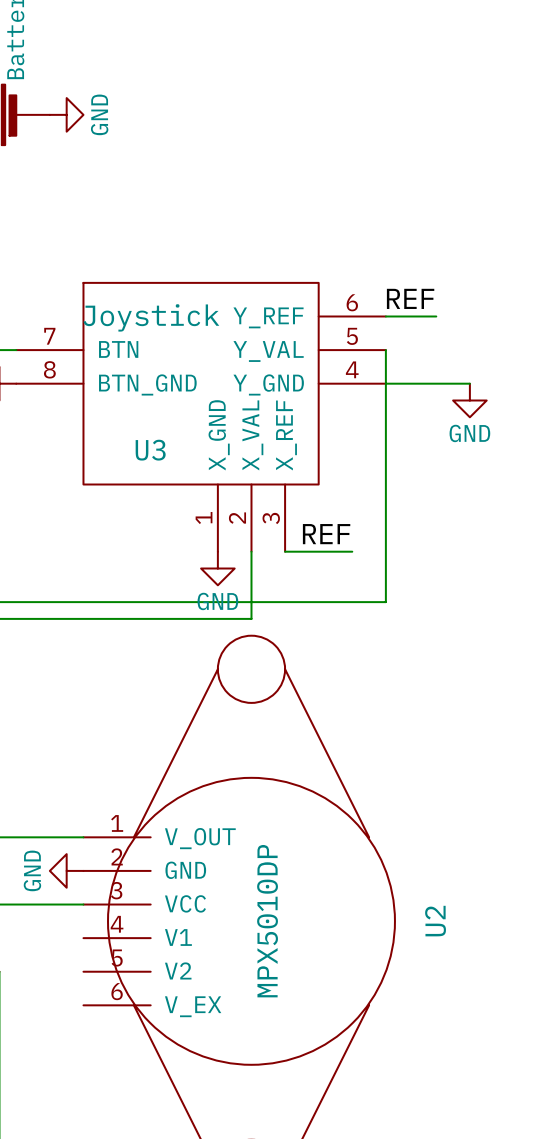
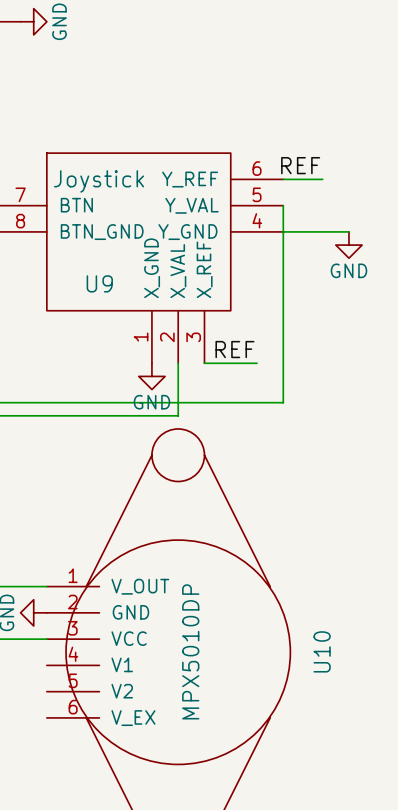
U3 name: U3 (150, 450) -> U9 (99, 283)
U2 name: U2 (435, 921) -> U10 (322, 651)

